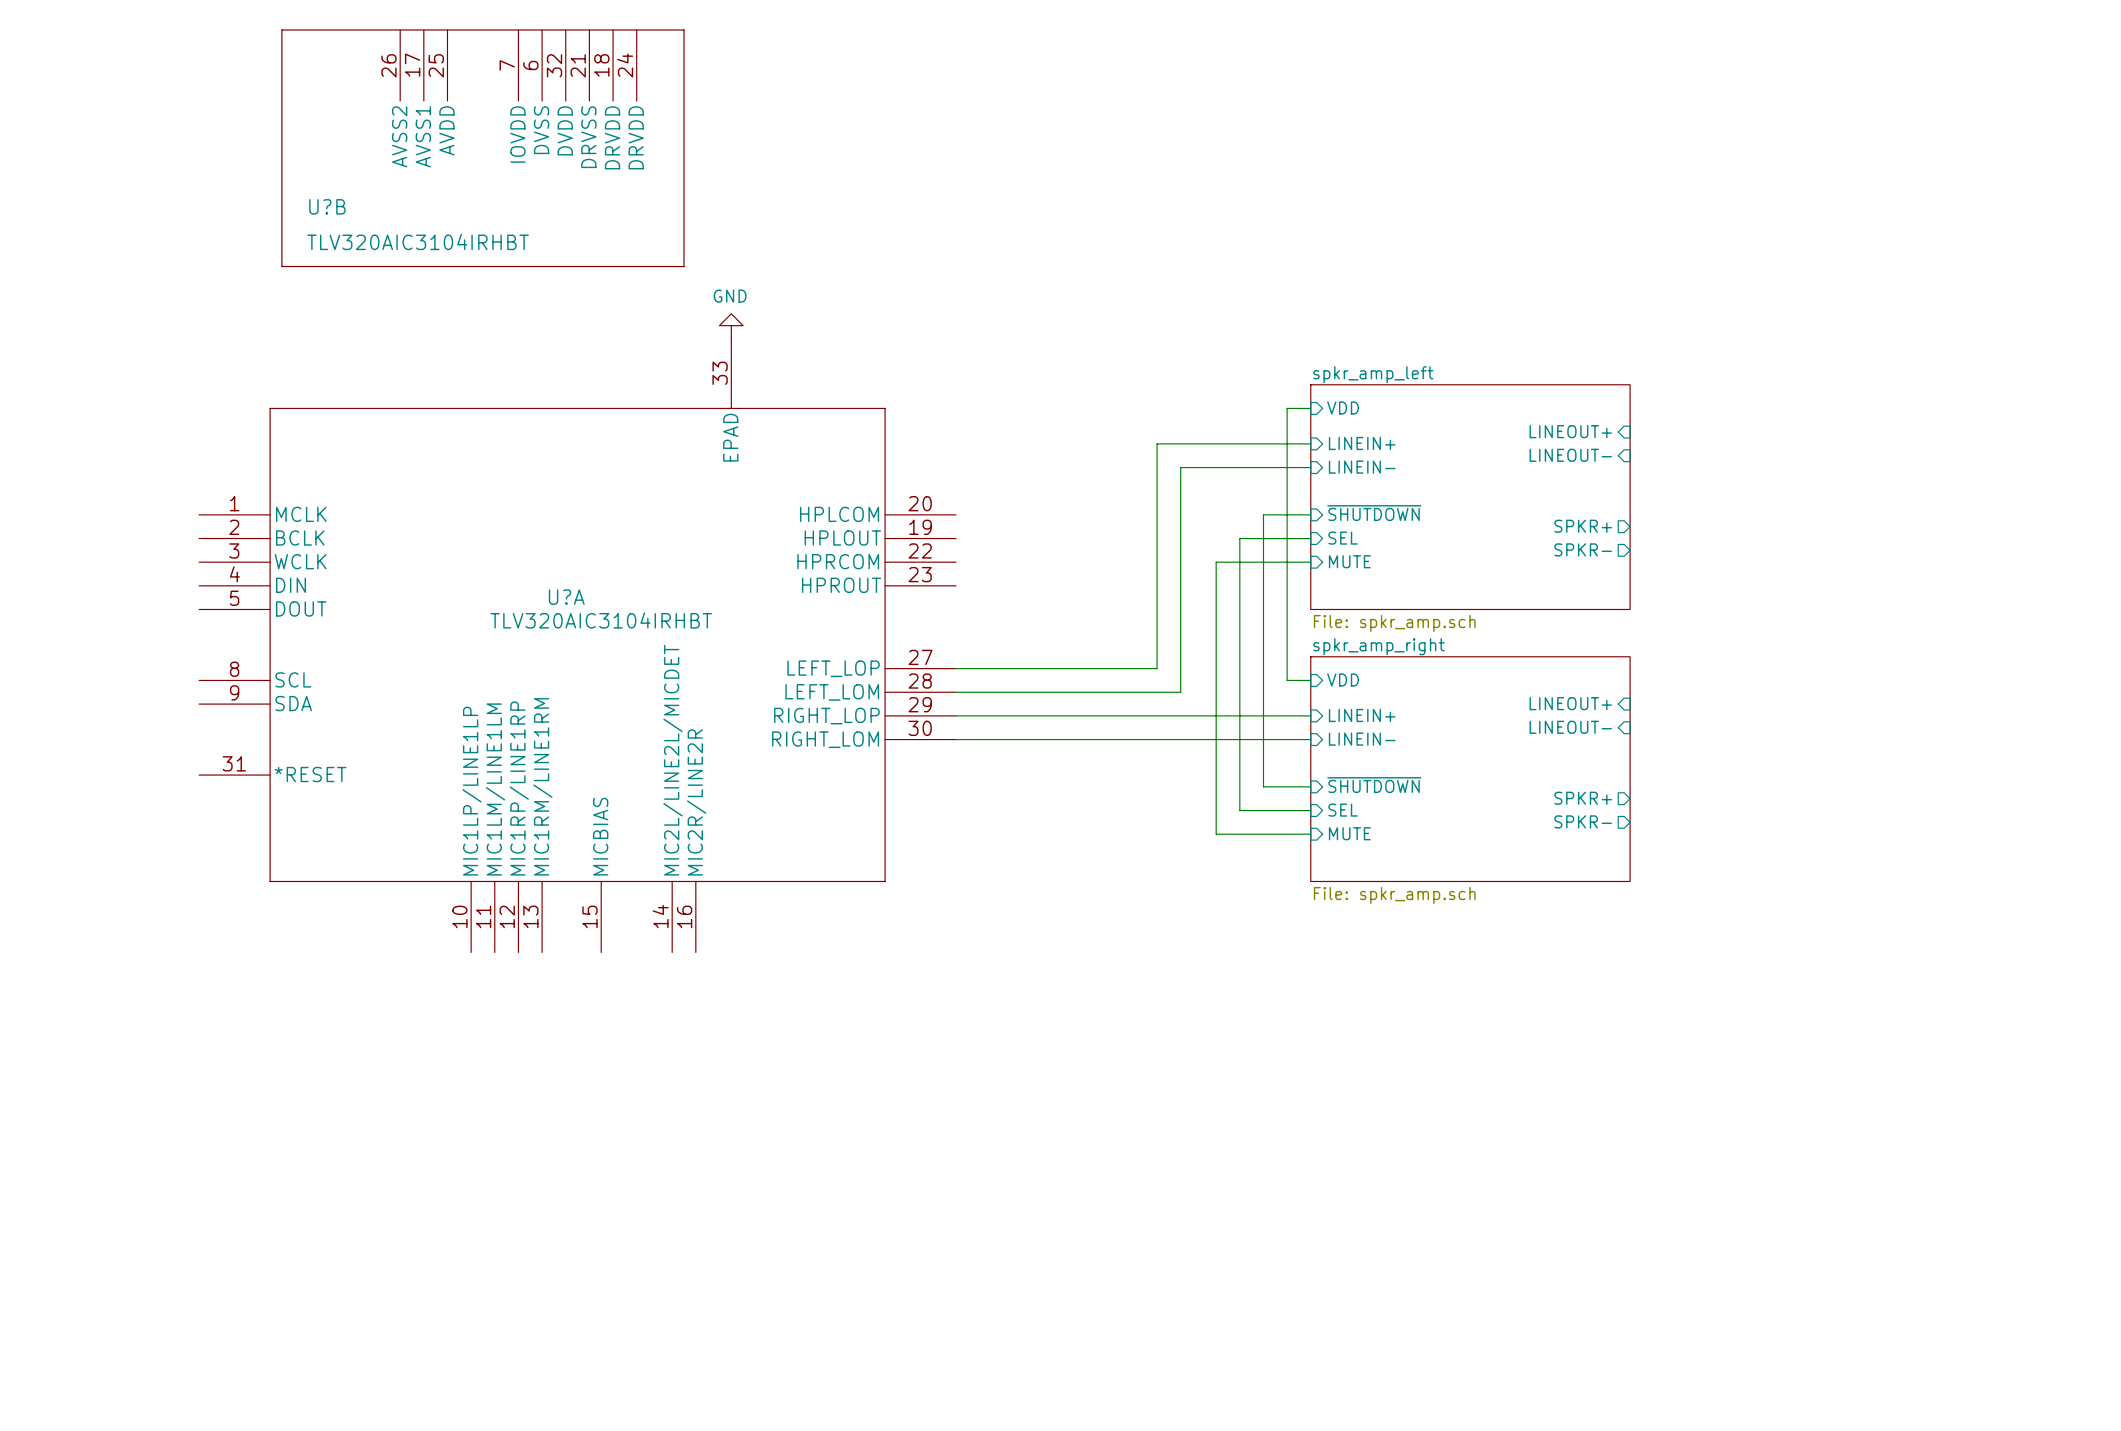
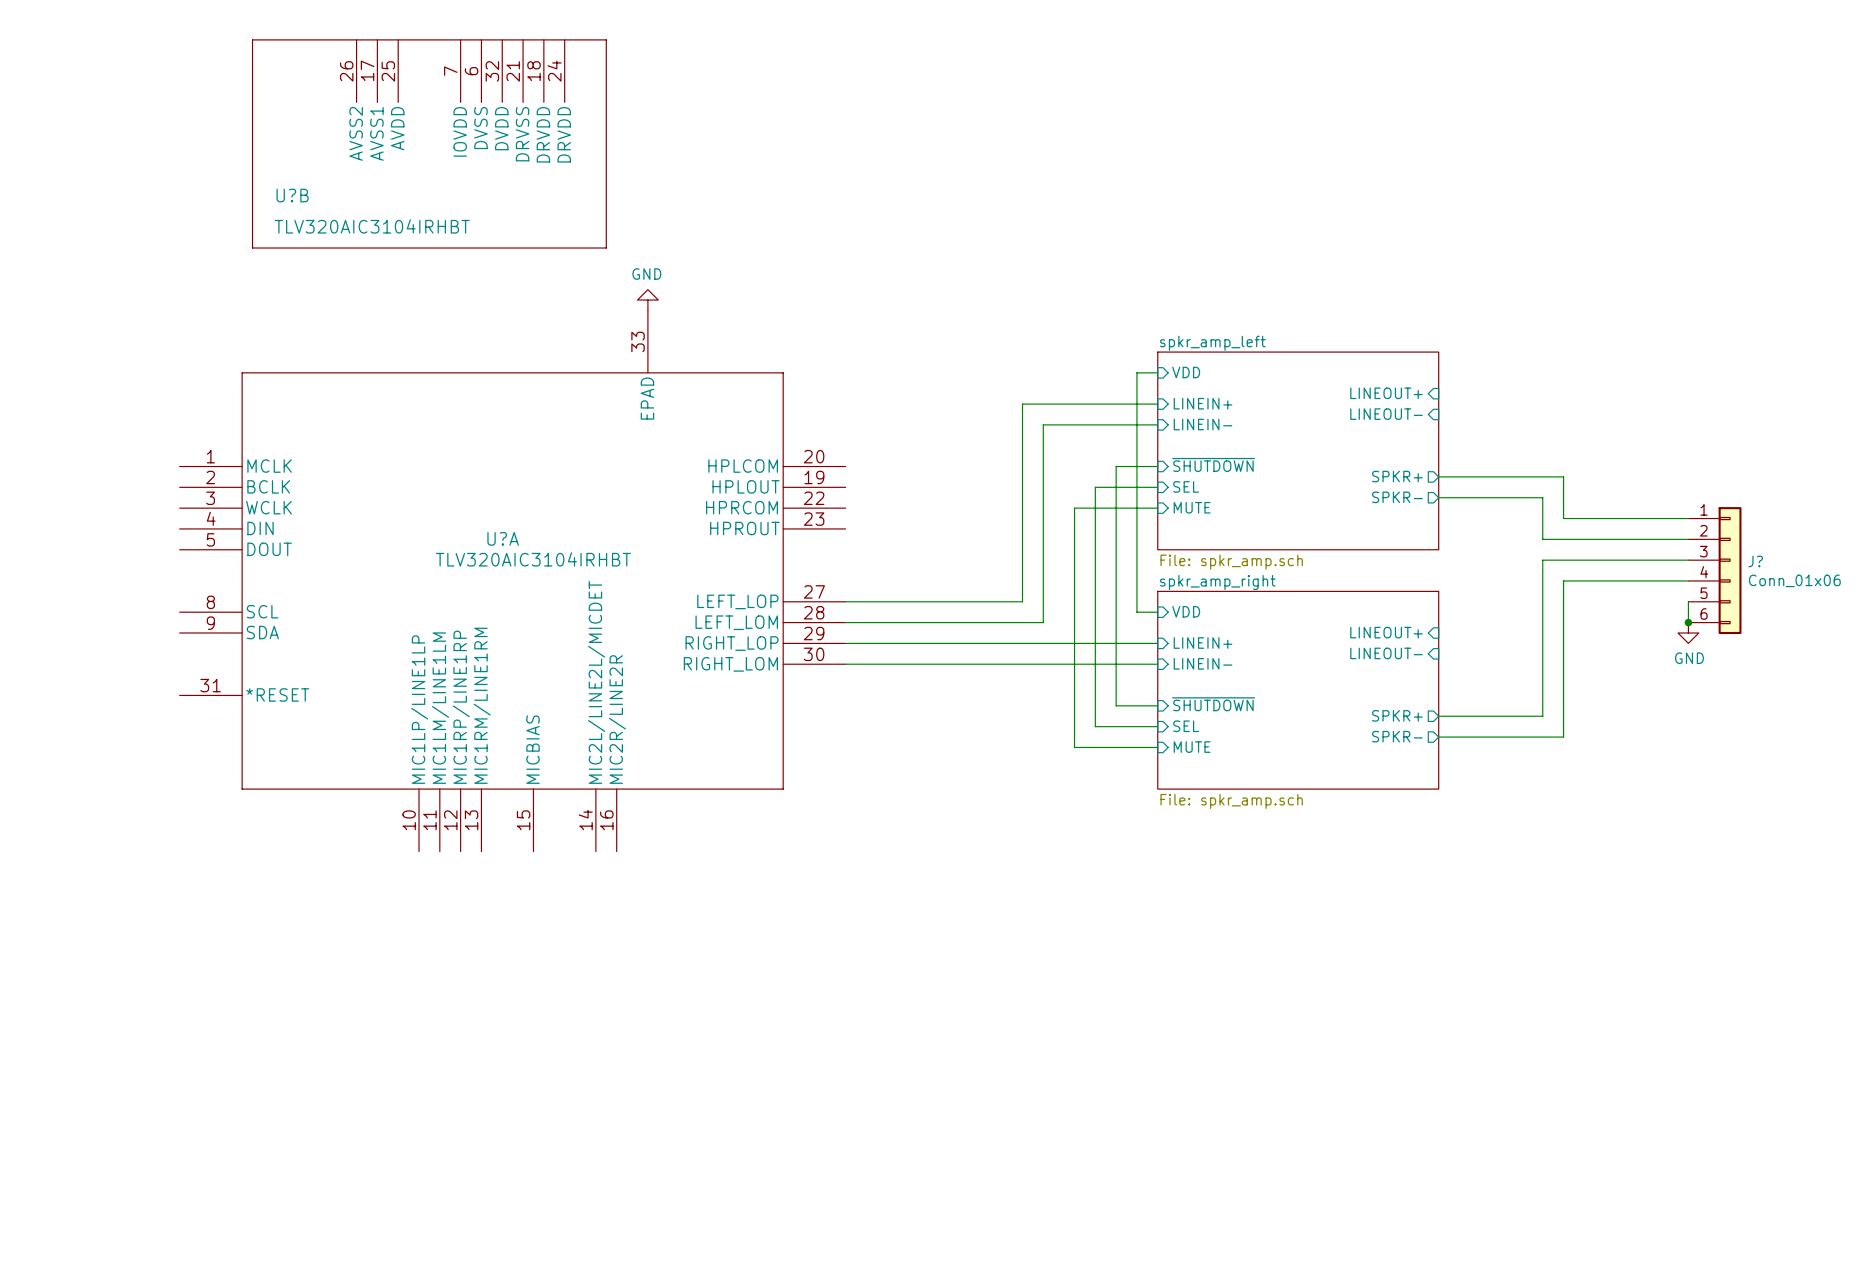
wire: none -> (1438, 476) (1563, 476) (1563, 518) (1688, 518)
wire: none -> (1438, 497) (1542, 497) (1542, 539) (1688, 539)
wire: none -> (1688, 560) (1542, 560) (1542, 716) (1438, 716)
J?: none -> Conn_01x06 (1714, 570)
wire: none -> (1688, 580) (1563, 580) (1563, 737) (1438, 737)
wire: none -> (1688, 601) (1688, 622)
junction: none -> (1688, 622)
power symbol: none -> GND (1688, 633)

